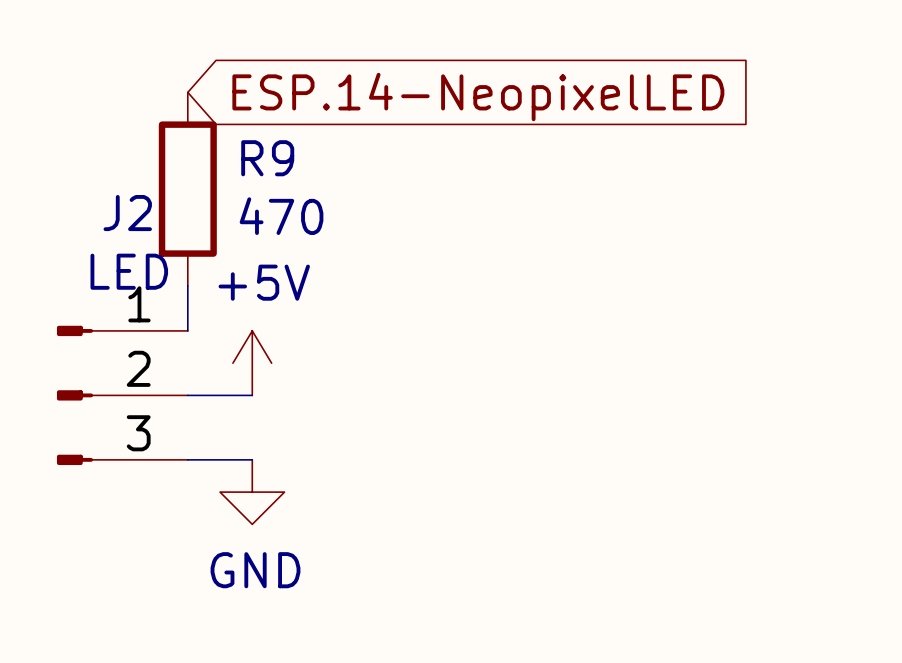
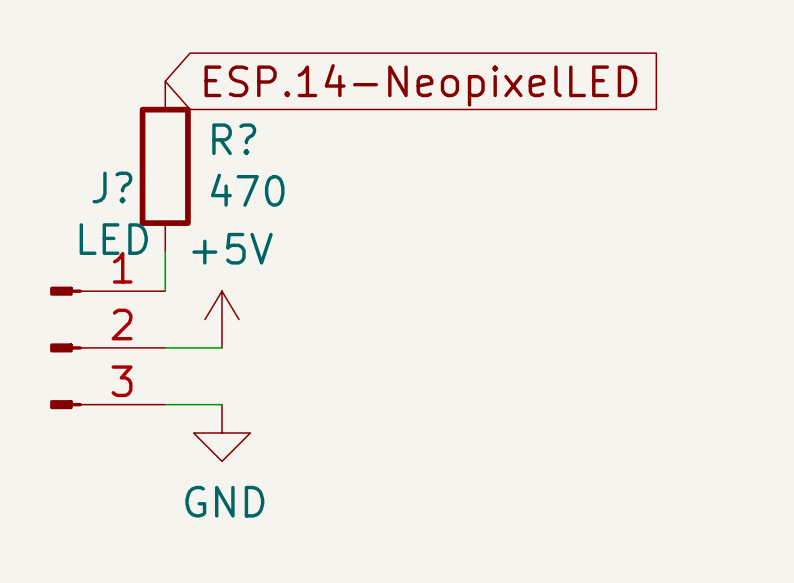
R9 name: R9 (267, 158) -> R? (234, 139)
J2 name: J2 (127, 213) -> J? (112, 187)

